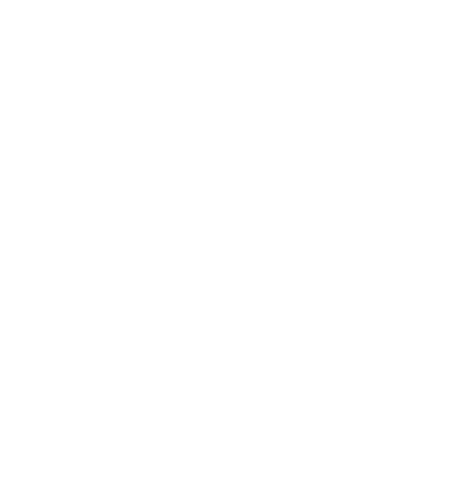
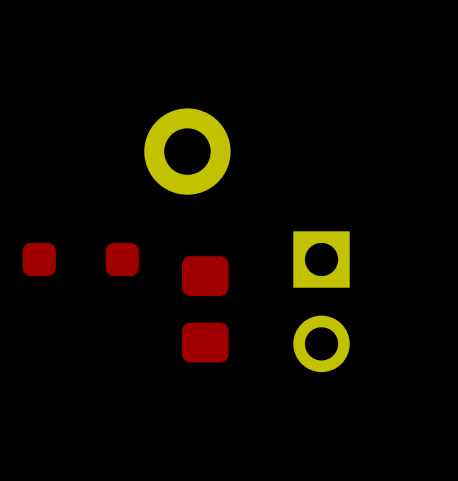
part: none -> (187, 151)
part: none -> (80, 259)
part: none -> (321, 301)
part: none -> (205, 309)

